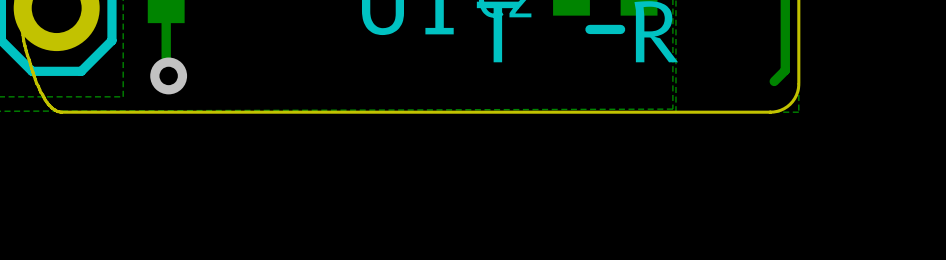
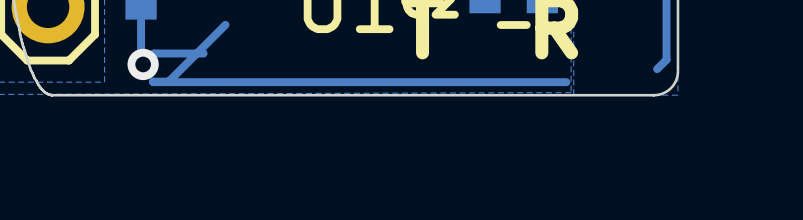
track: none -> (225, 24) (168, 81) (153, 81)
track: none -> (203, 53) (154, 53) (143, 64)
track: none -> (566, 82) (153, 82)

